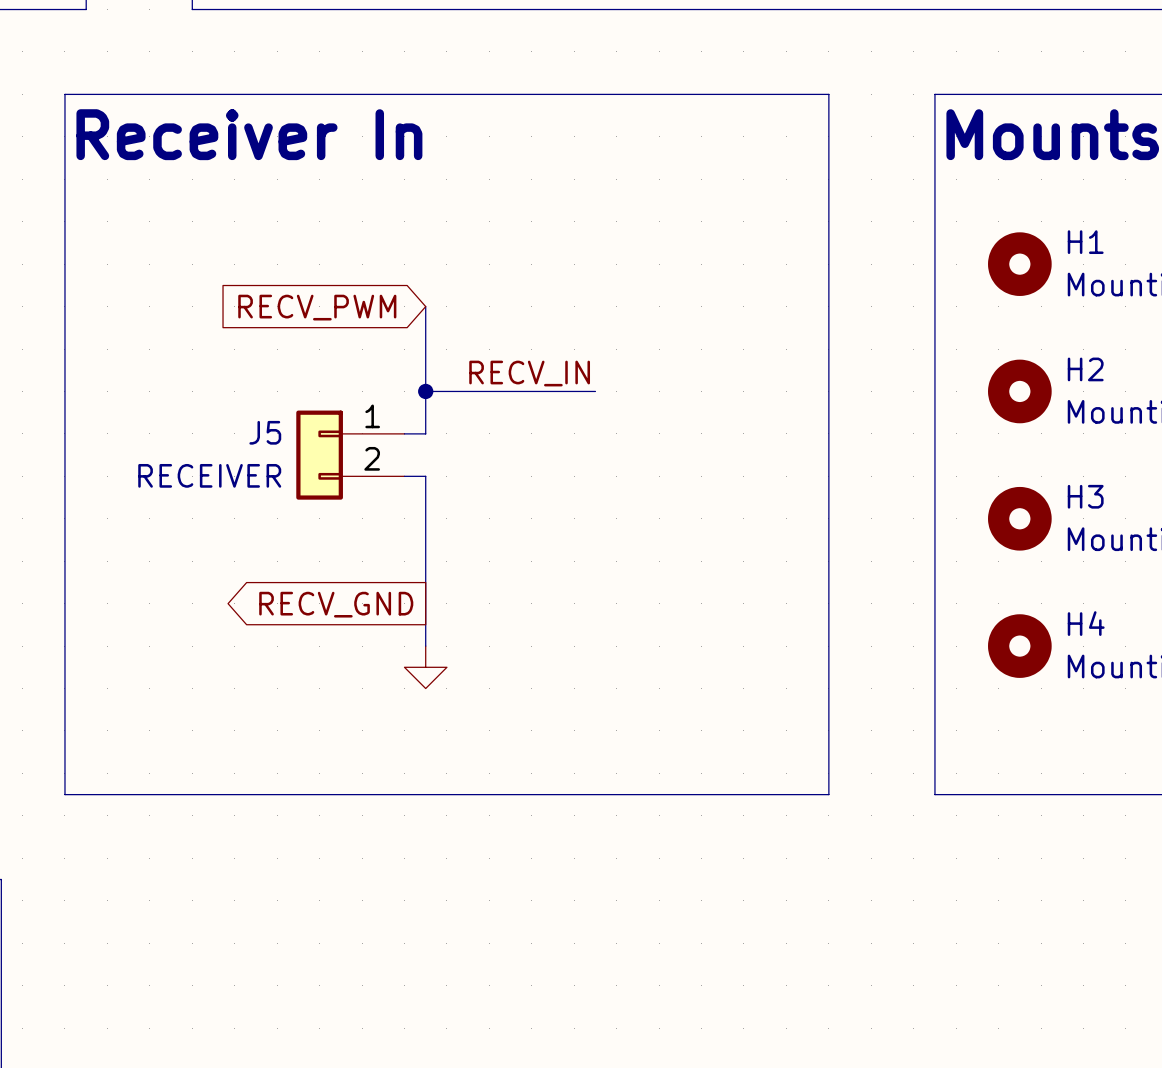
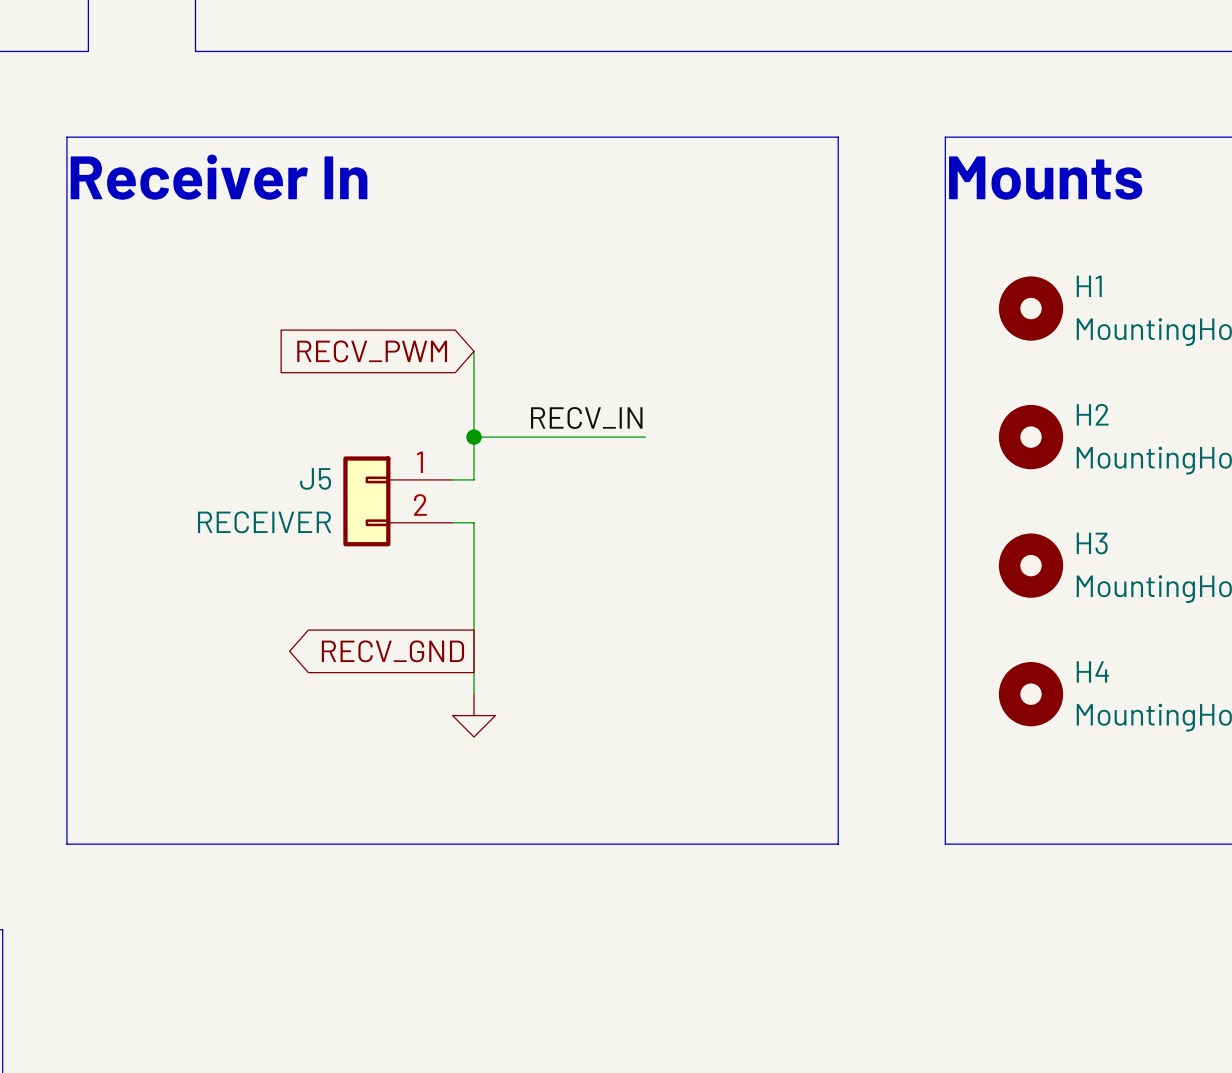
wire: (425, 306) (425, 433) (404, 433) -> (474, 351) (474, 479) (452, 479)
global label position: RECV_PWM (317, 307) -> RECV_PWM (372, 351)
label position: RECV_IN (529, 373) -> RECV_IN (586, 417)
wire: (425, 391) (468, 391) -> (602, 437) (645, 437)
junction position: (425, 391) -> (474, 437)
J5 position: (350, 455) -> (397, 501)
wire: (404, 476) (425, 476) (425, 646) -> (452, 522) (474, 522) (474, 694)
global label position: RECV_GND (336, 604) -> RECV_GND (392, 651)
power symbol position: (425, 667) -> (474, 715)

